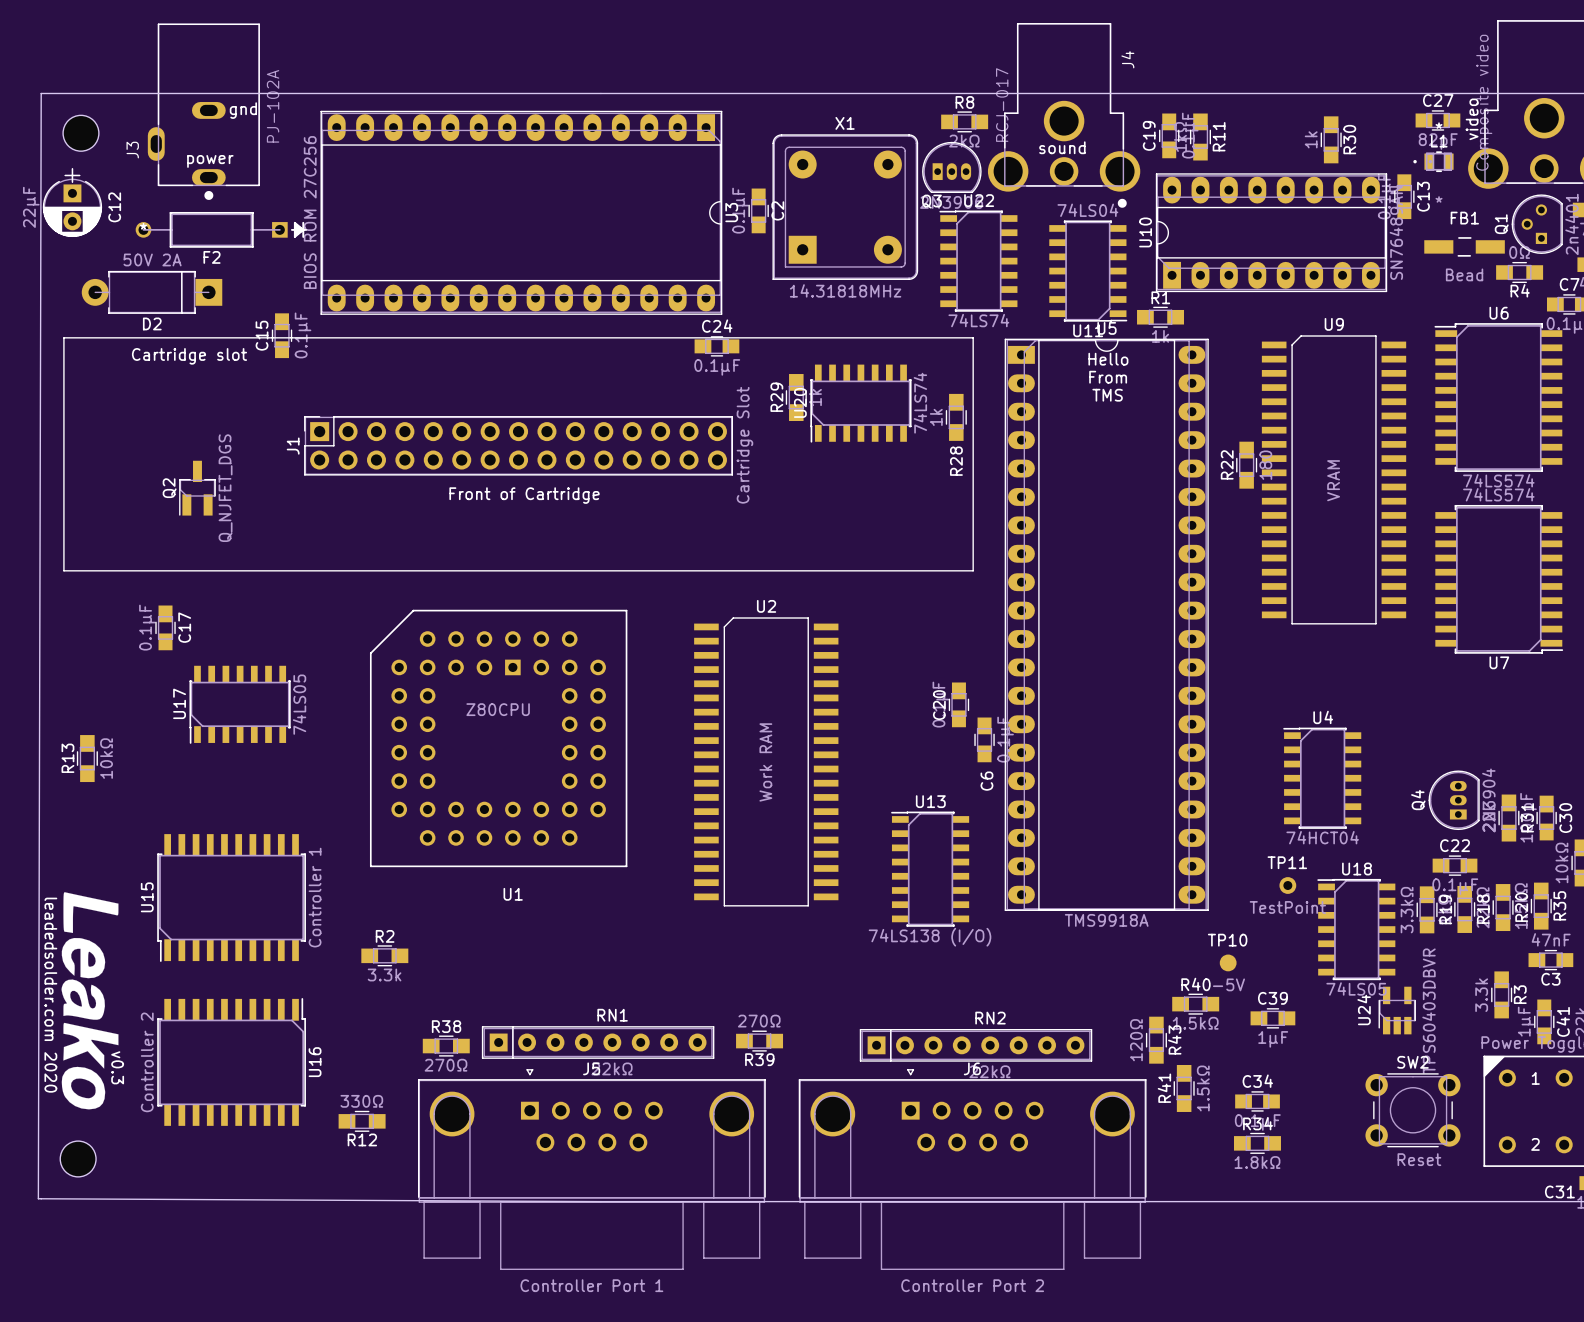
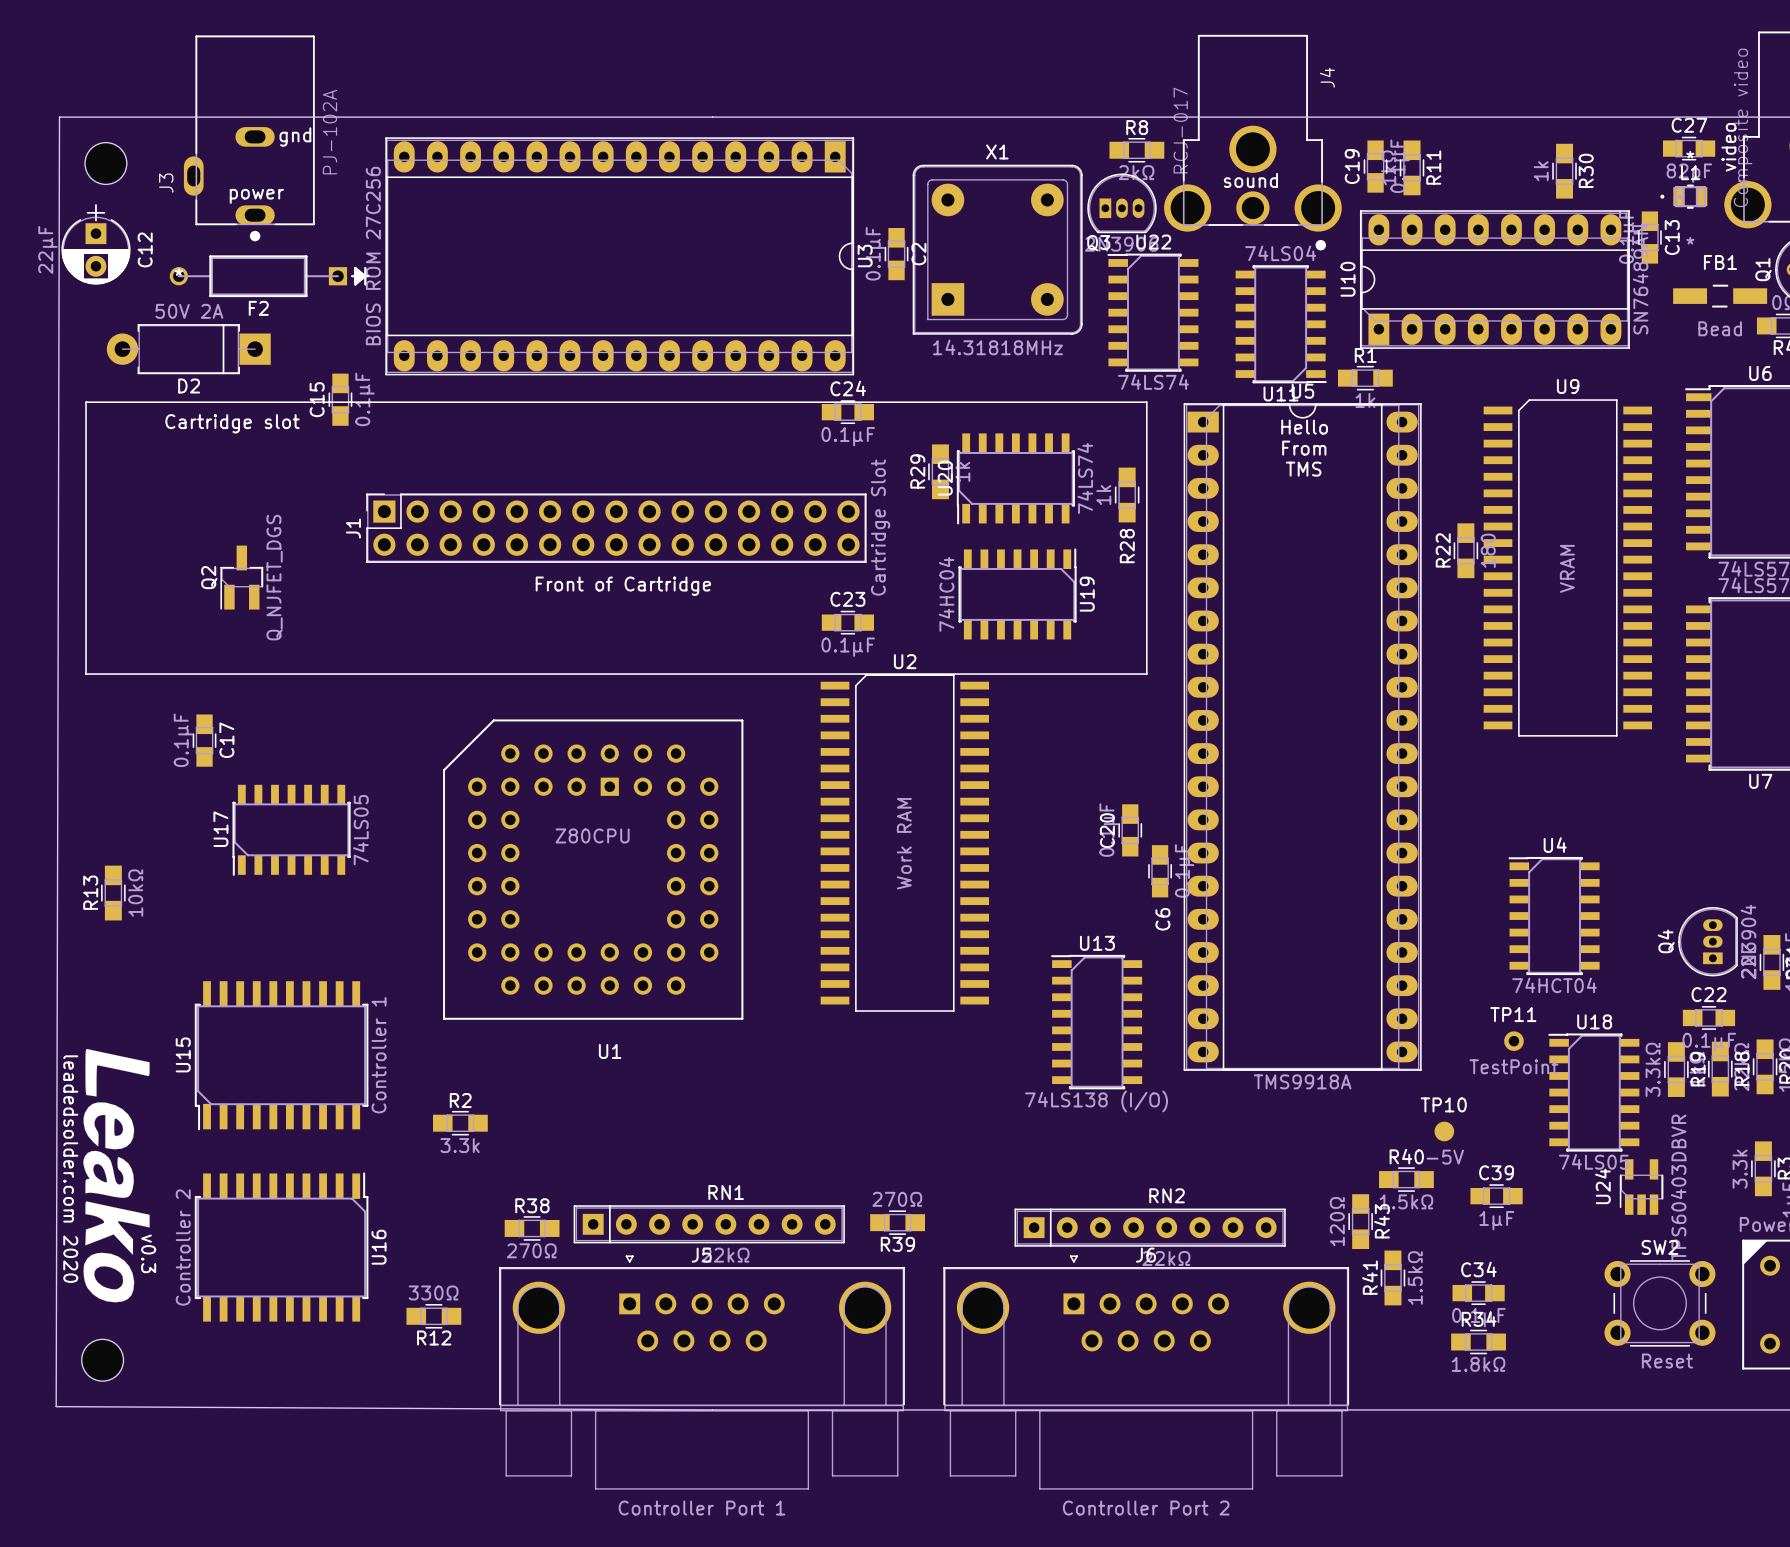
U19: none -> 74HC04 (1017, 593)
C23: none -> 0.1µF (847, 622)
U2 position: (766, 761) -> (904, 843)

